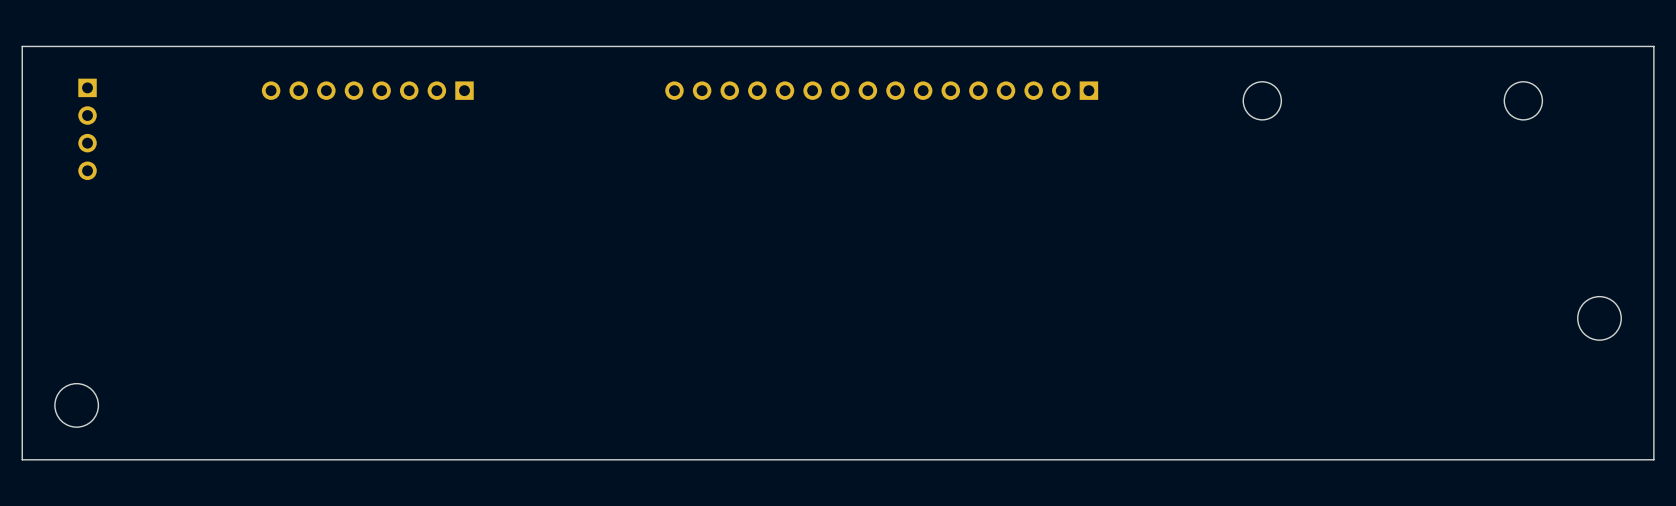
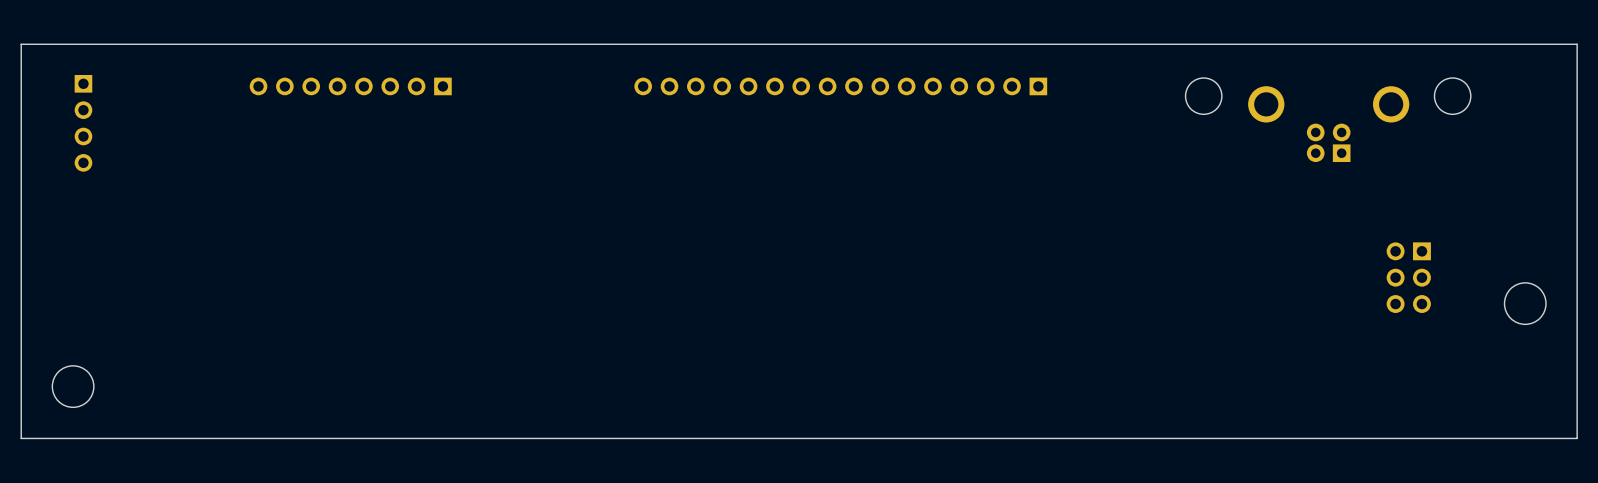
part: none -> (1328, 124)
part: none -> (1408, 277)

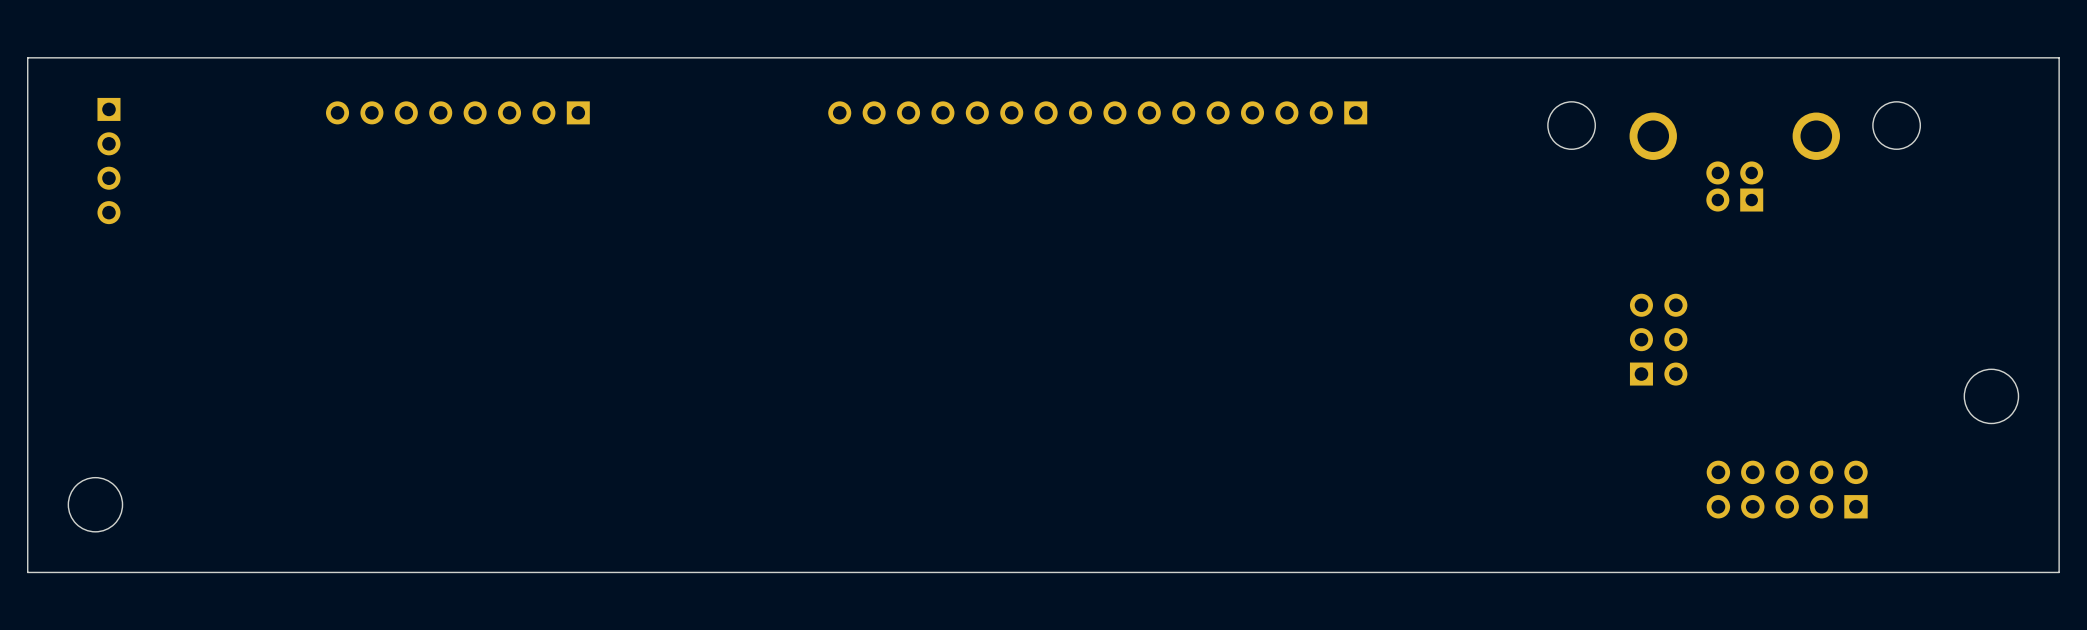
part: none -> (1658, 339)
part: (1408, 277) -> none
part: none -> (1787, 489)

